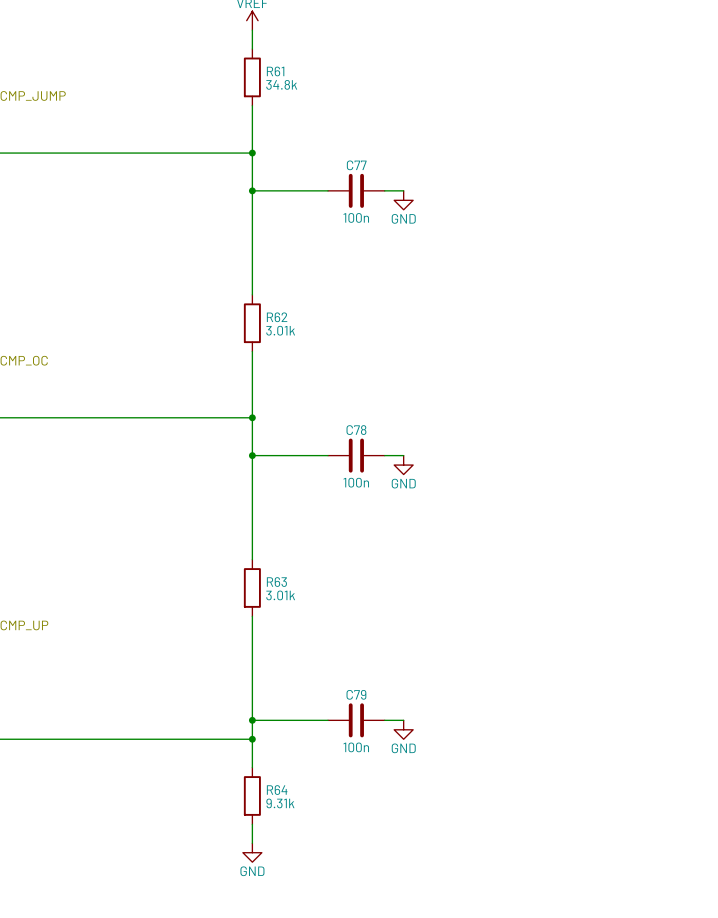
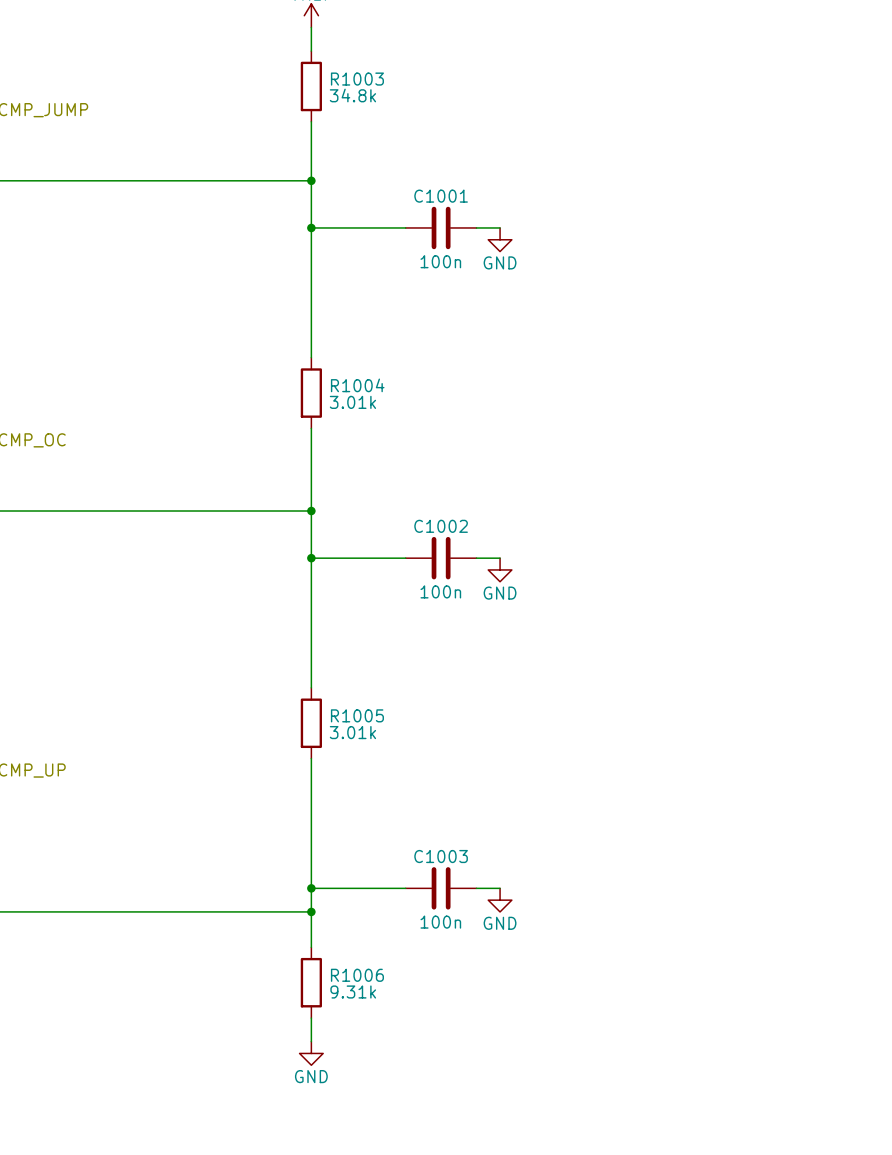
R61 name: R61 (275, 71) -> R1003 (357, 79)
C77 name: C77 (356, 165) -> C1001 (441, 196)
R62 name: R62 (277, 317) -> R1004 (357, 385)
C78 name: C78 (356, 430) -> C1002 (441, 526)
R63 name: R63 (276, 582) -> R1005 (357, 715)
C79 name: C79 (356, 694) -> C1003 (441, 856)
R64 name: R64 (277, 790) -> R1006 (357, 975)

